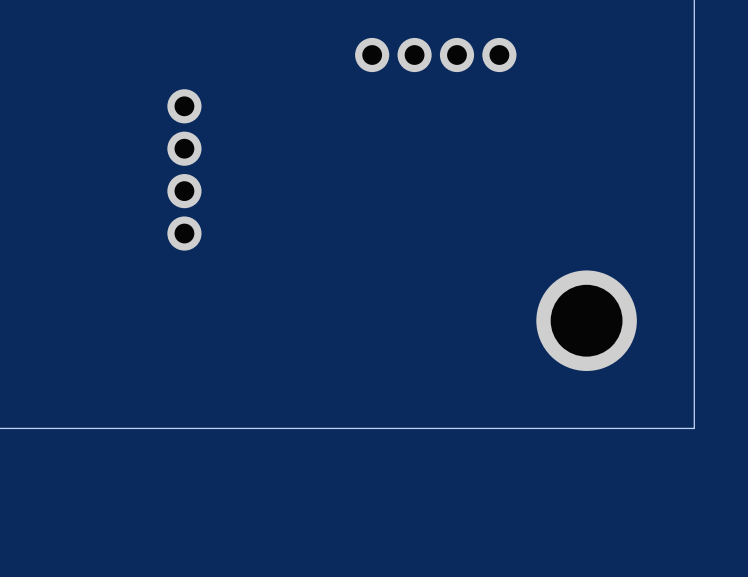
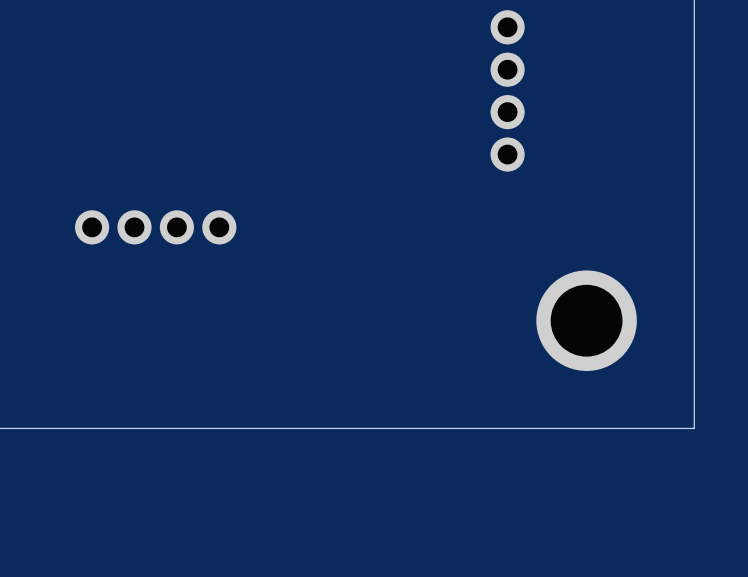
part rotation: 0° (435, 55) -> 90° clockwise (507, 90)
part rotation: 0° (184, 169) -> 90° clockwise (155, 227)

